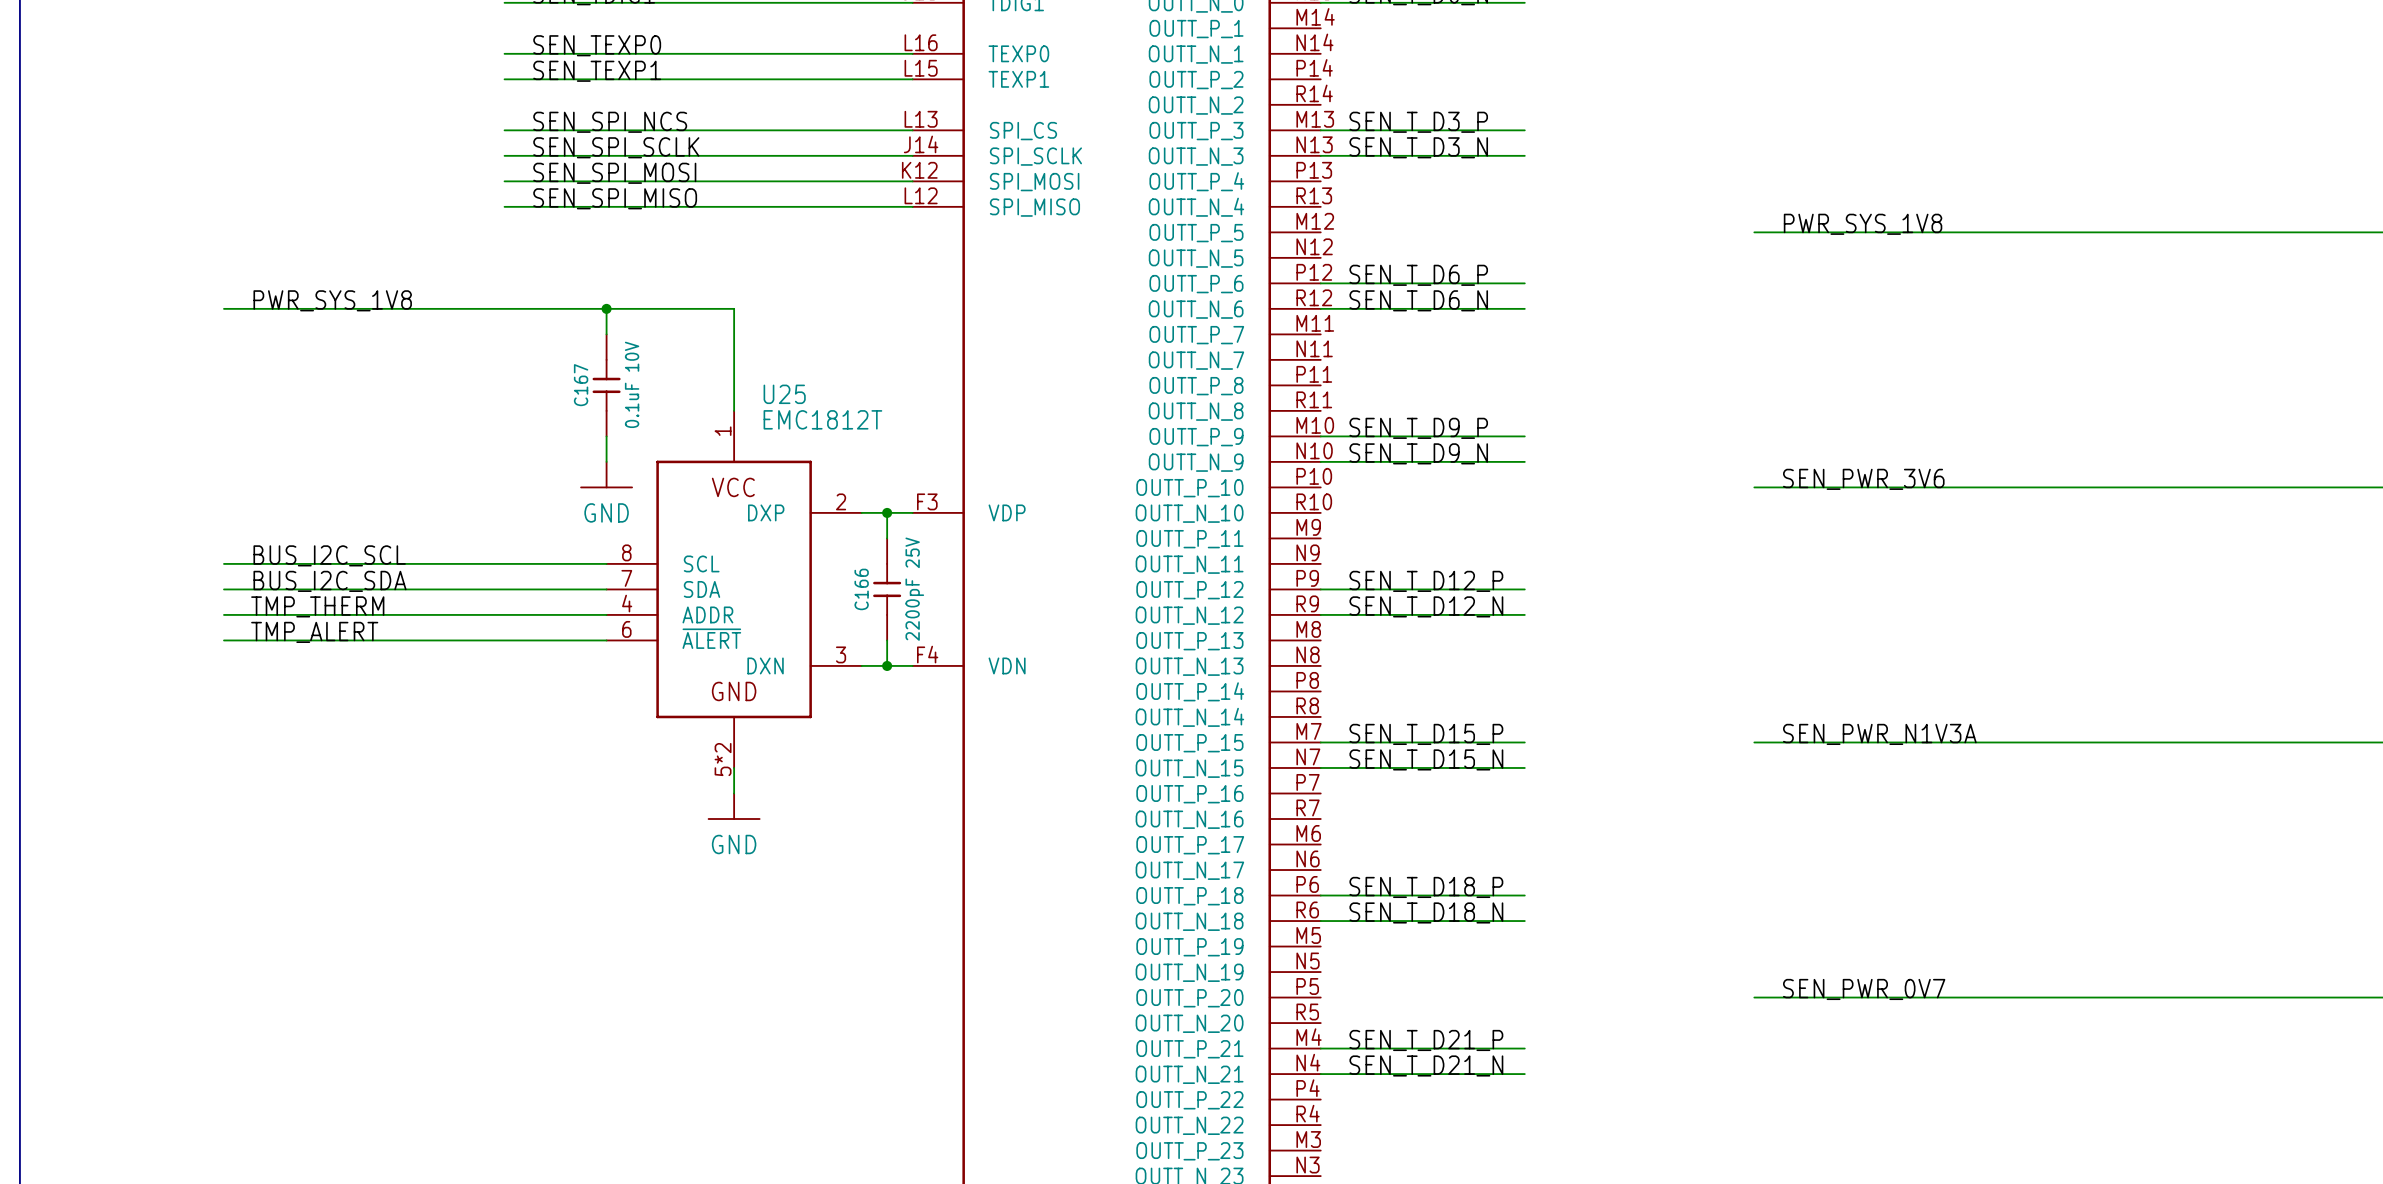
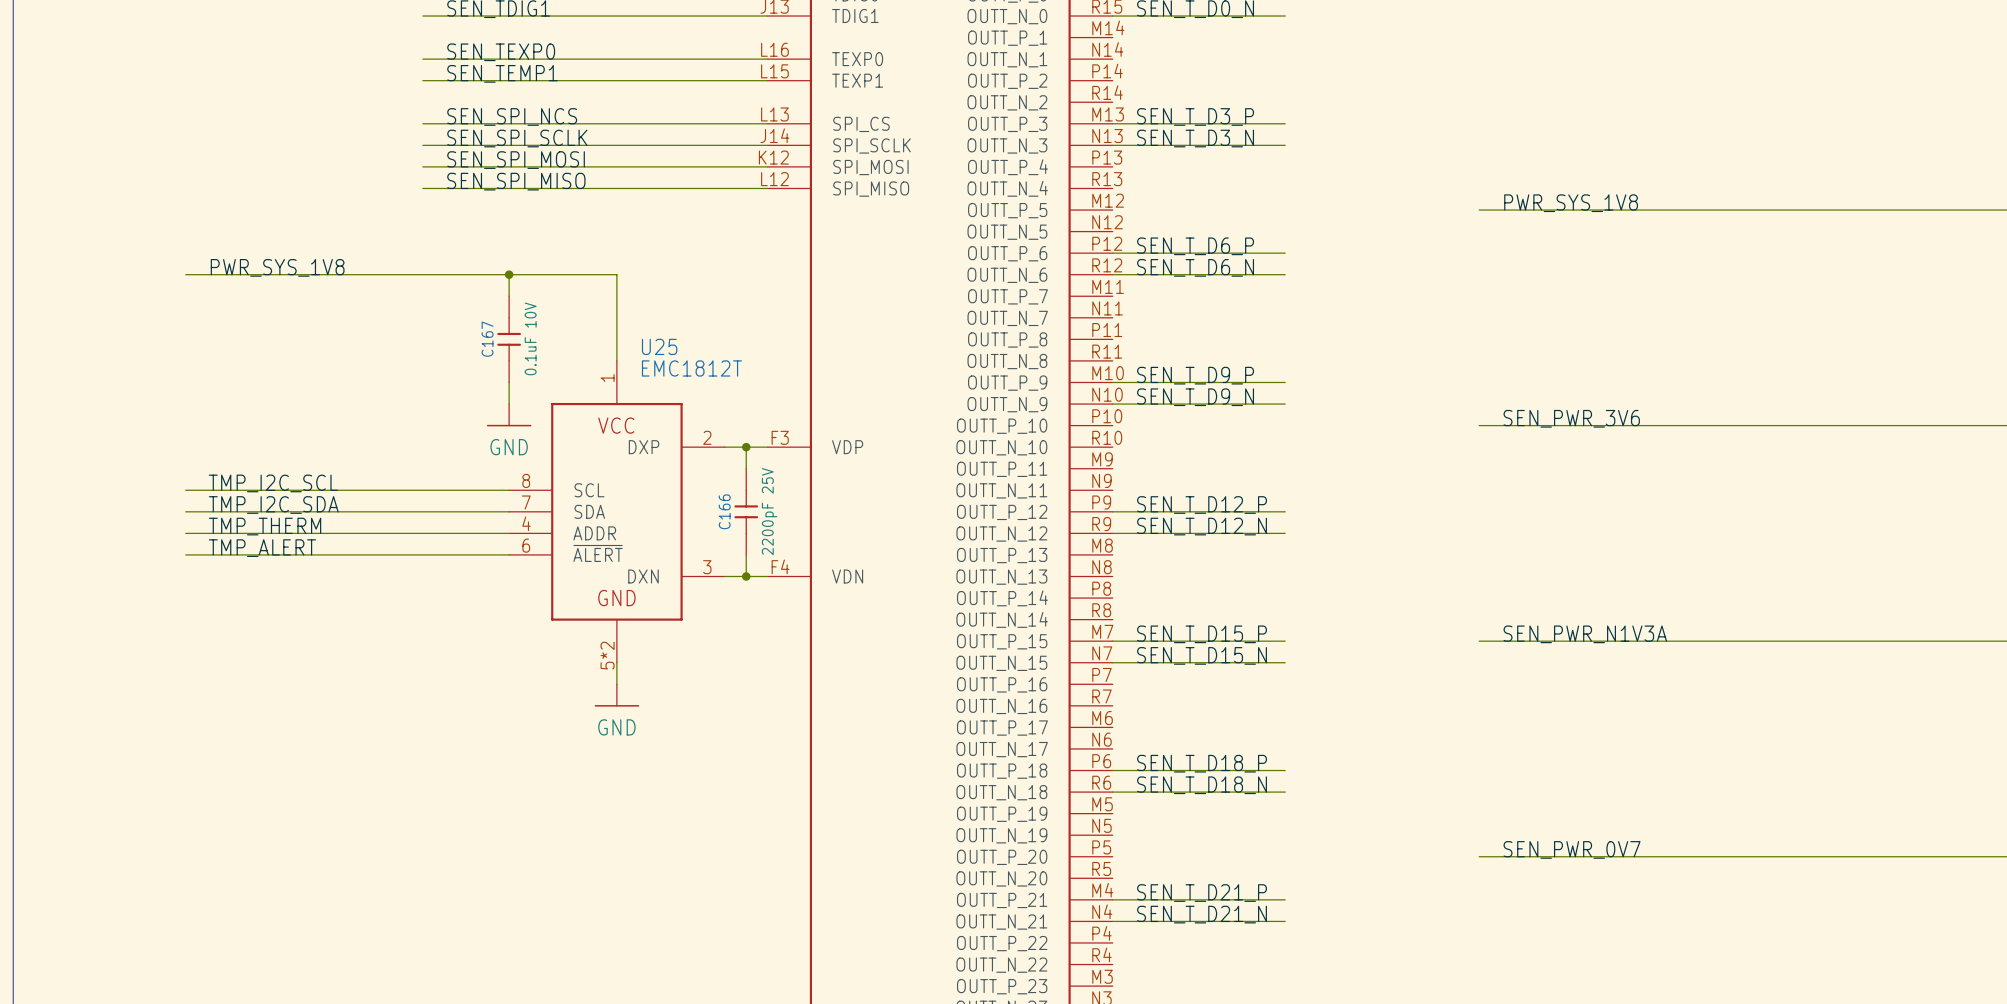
label: SEN_TEXP1 (597, 71) -> SEN_TEMP1 (502, 73)
label: BUS_I2C_SCL (329, 555) -> TMP_I2C_SCL (273, 483)
label: BUS_I2C_SDA (330, 581) -> TMP_I2C_SDA (273, 505)

